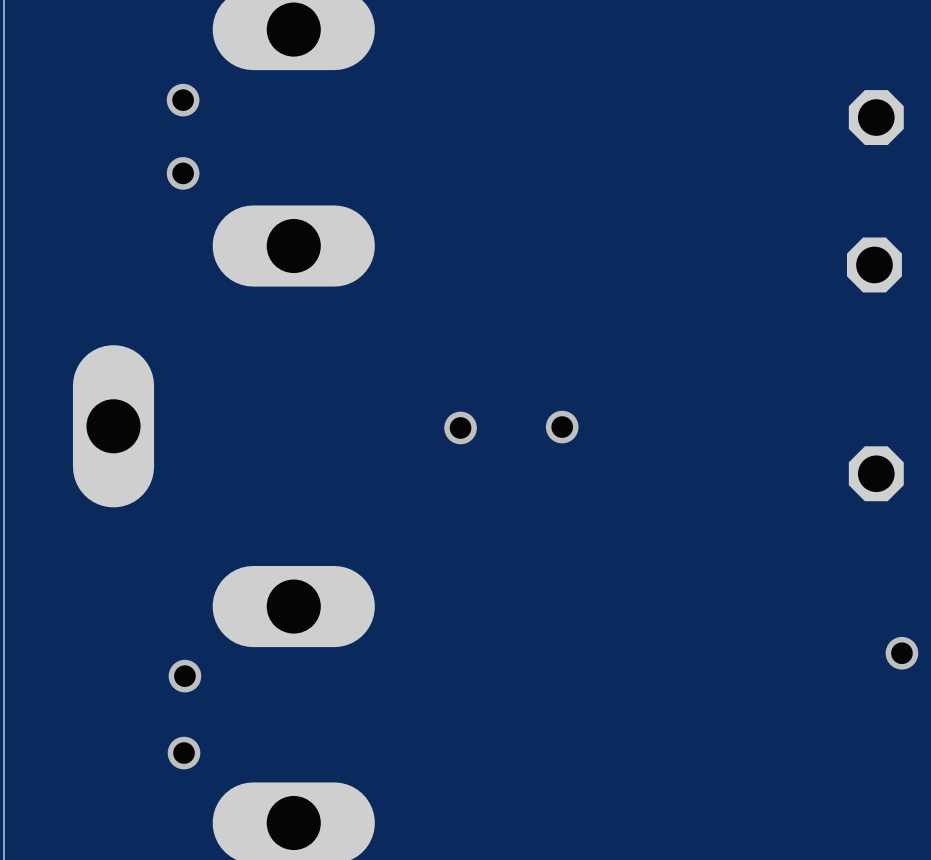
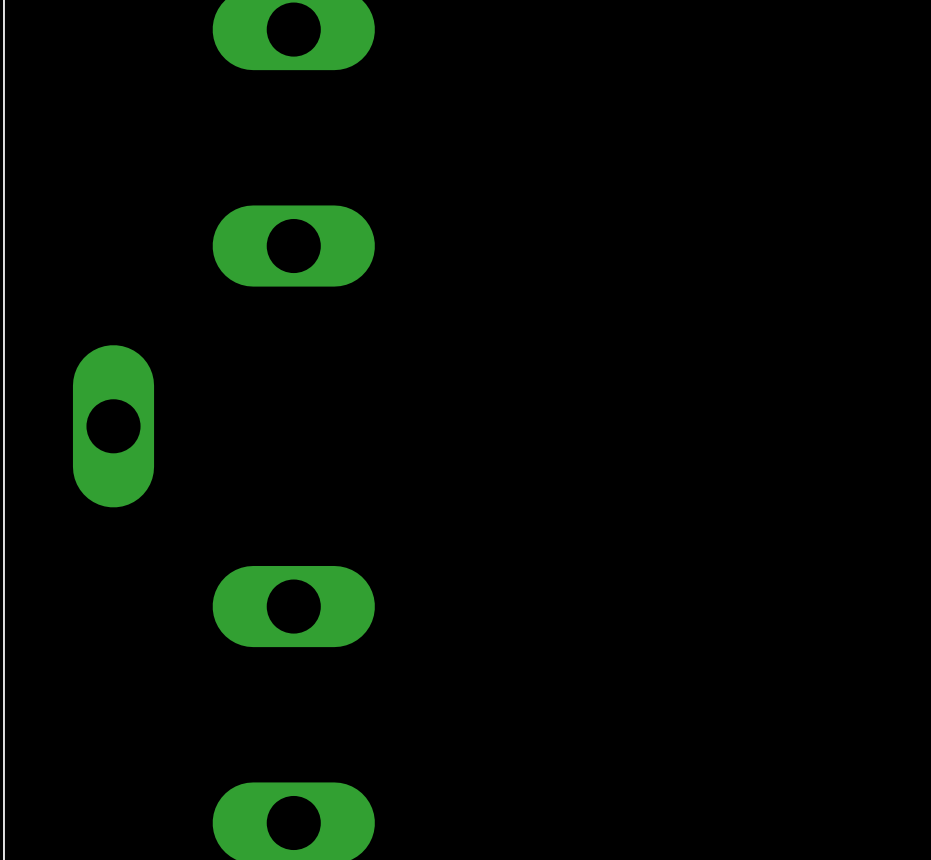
via: (183, 100) -> none
part: (876, 117) -> none
via: (183, 173) -> none
part: (874, 264) -> none
via: (460, 427) -> none
via: (562, 427) -> none
part: (876, 473) -> none
via: (901, 653) -> none
via: (184, 676) -> none
via: (184, 753) -> none

